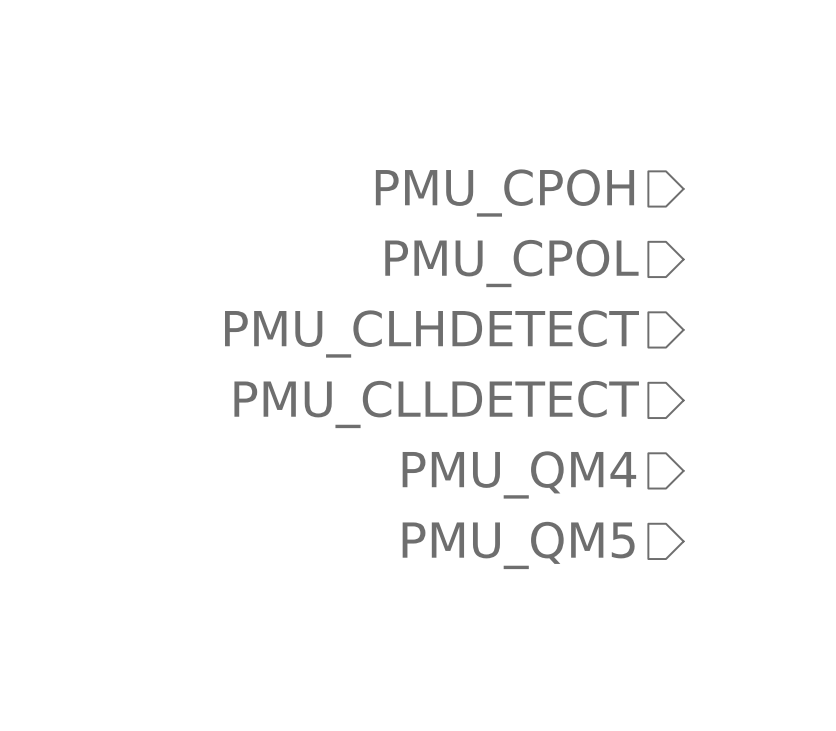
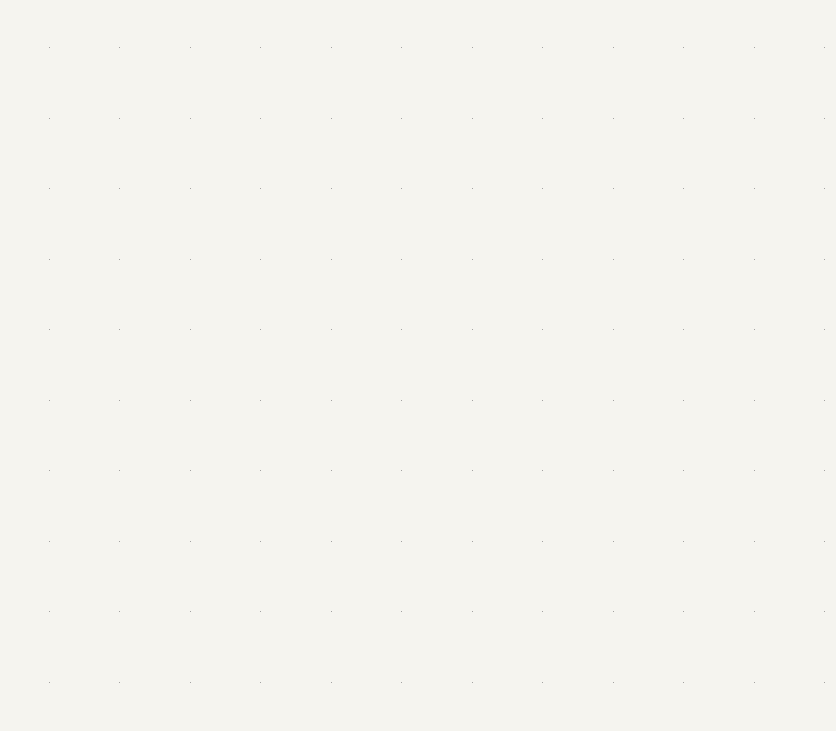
hierarchical label: PMU_CPOH (504, 193) -> none
hierarchical label: PMU_CPOL (511, 263) -> none
hierarchical label: PMU_CLHDETECT (432, 334) -> none
hierarchical label: PMU_CLLDETECT (436, 404) -> none
hierarchical label: PMU_QM4 (519, 474) -> none
hierarchical label: PMU_QM5 (518, 545) -> none

